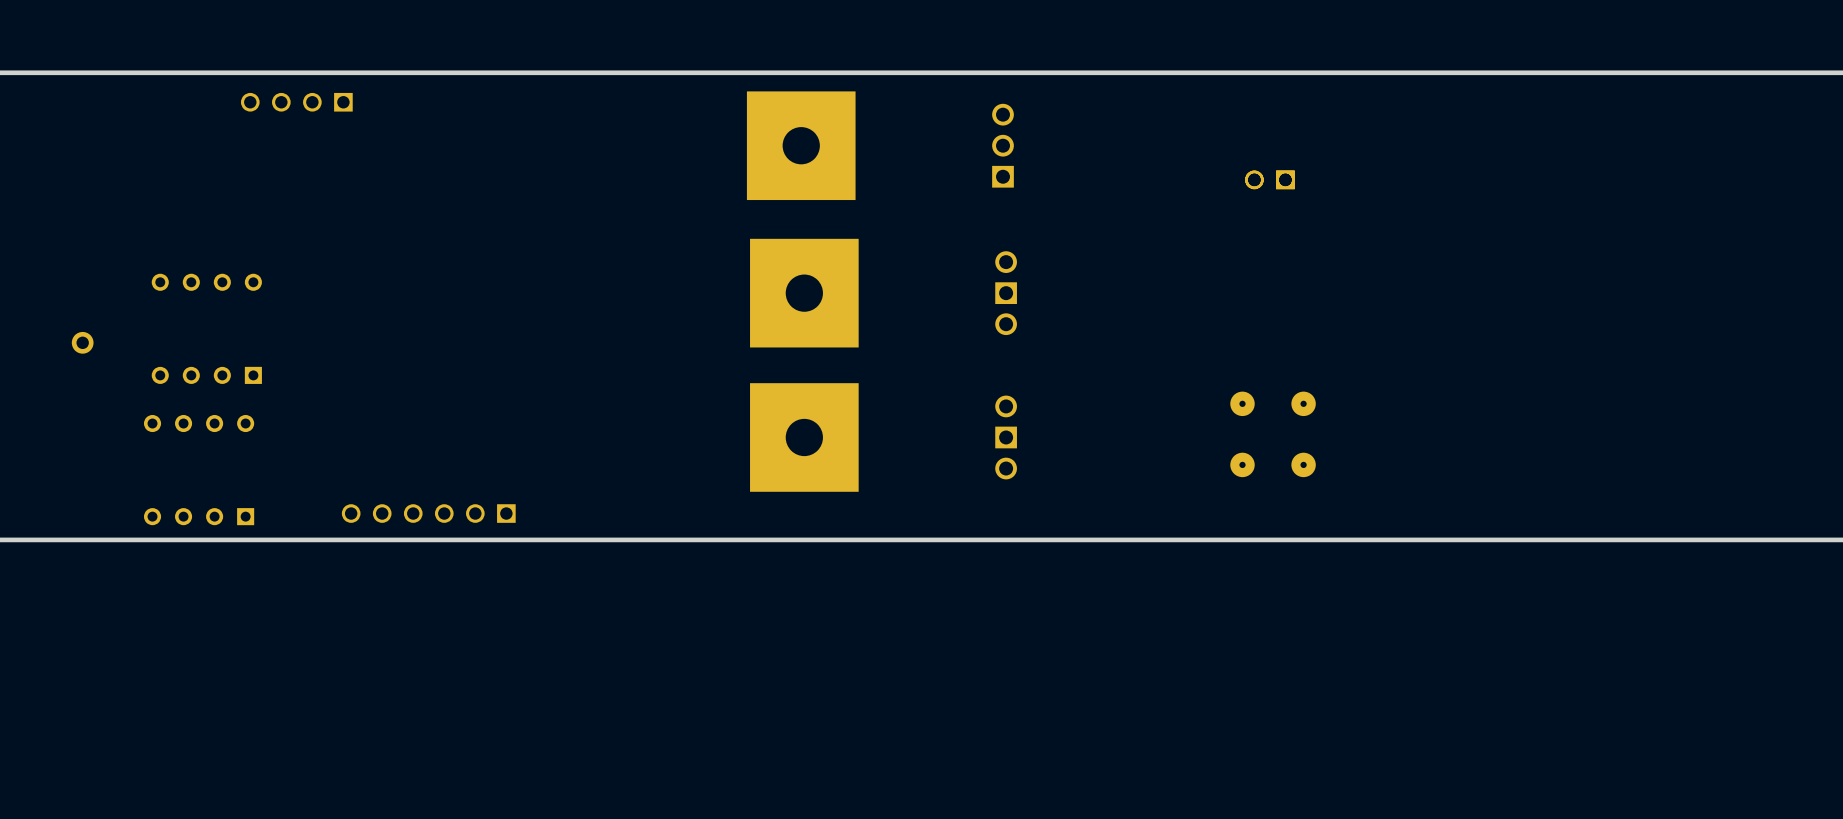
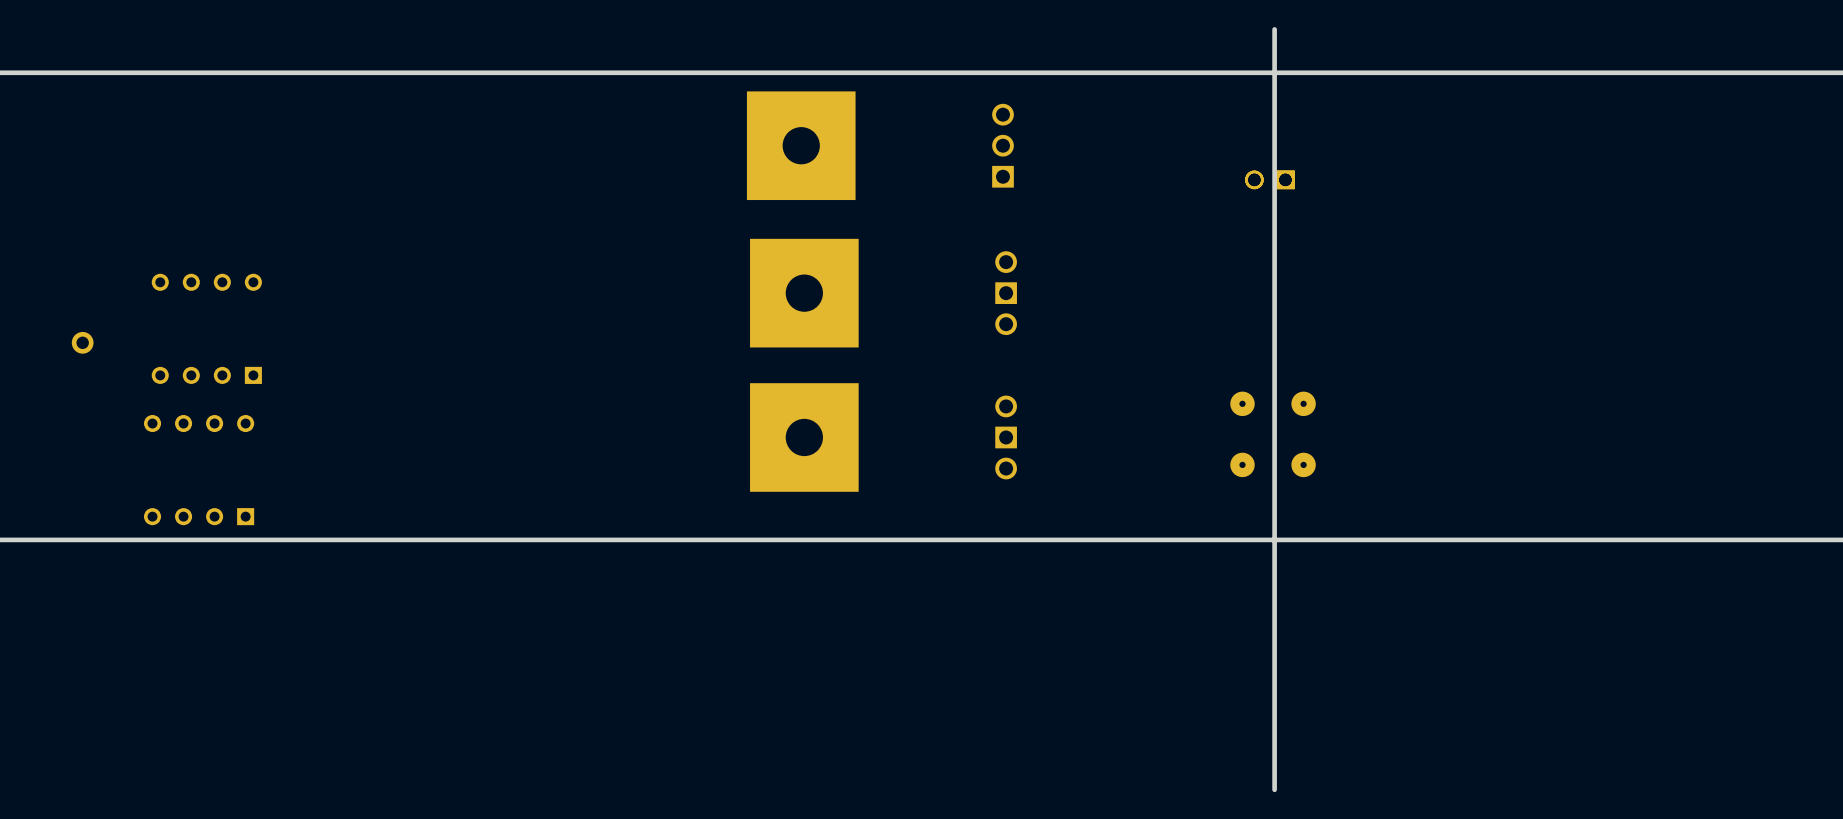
board edge: none -> (1274, 29) (1274, 789)
part: (296, 102) -> none
part: (428, 513) -> none

